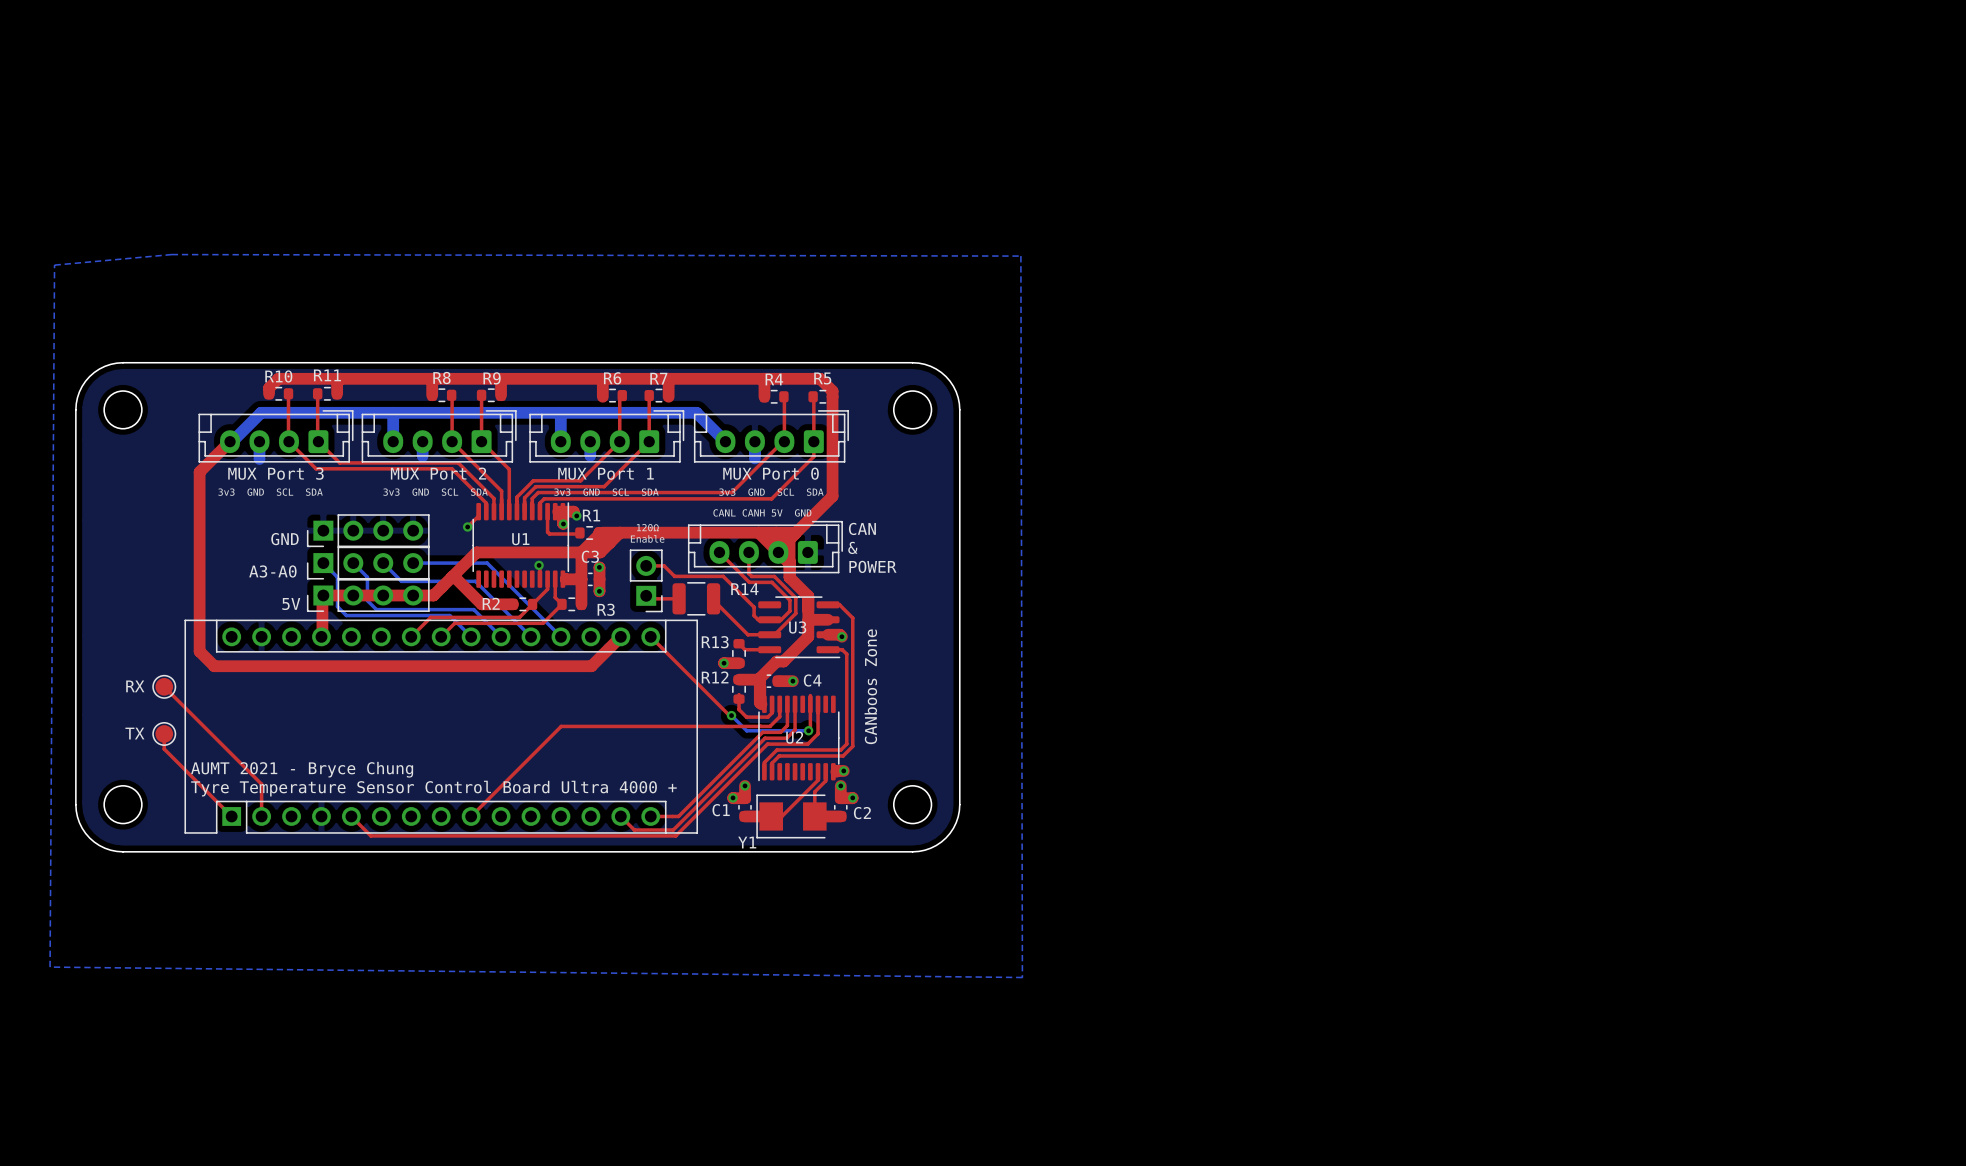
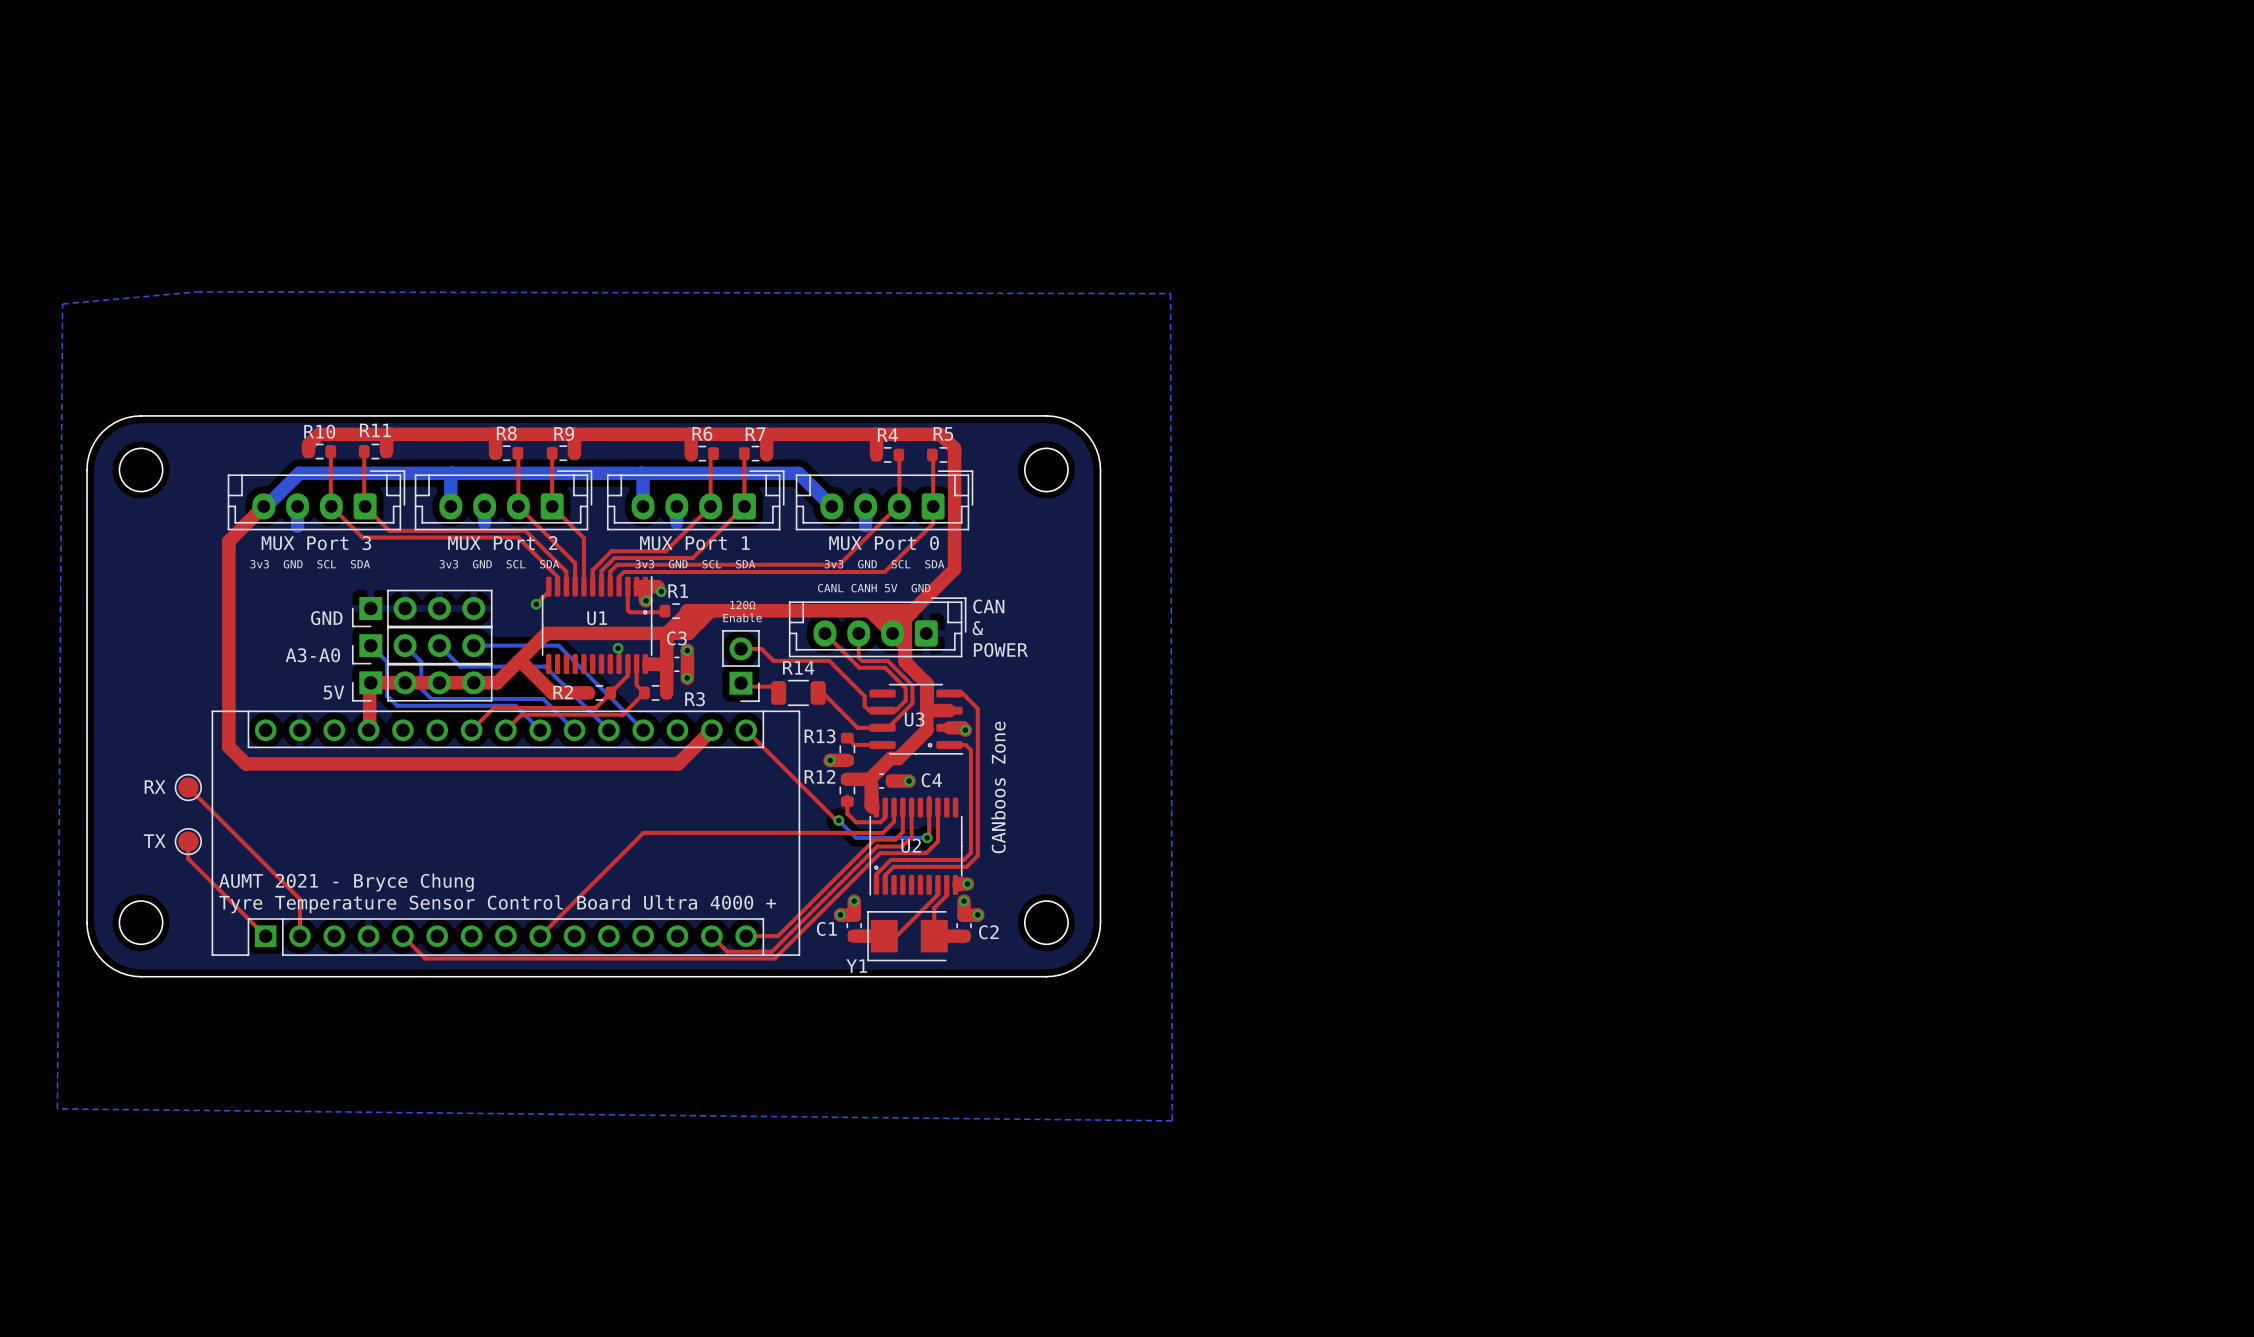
drawing: none -> [642, 610, 648, 615]
R14 footprint: [672, 582, 721, 616] -> [771, 679, 826, 707]
R14 name position: R14 (744, 589) -> R14 (798, 667)
drawing: none -> [927, 742, 933, 748]
drawing: none -> [874, 865, 879, 870]

